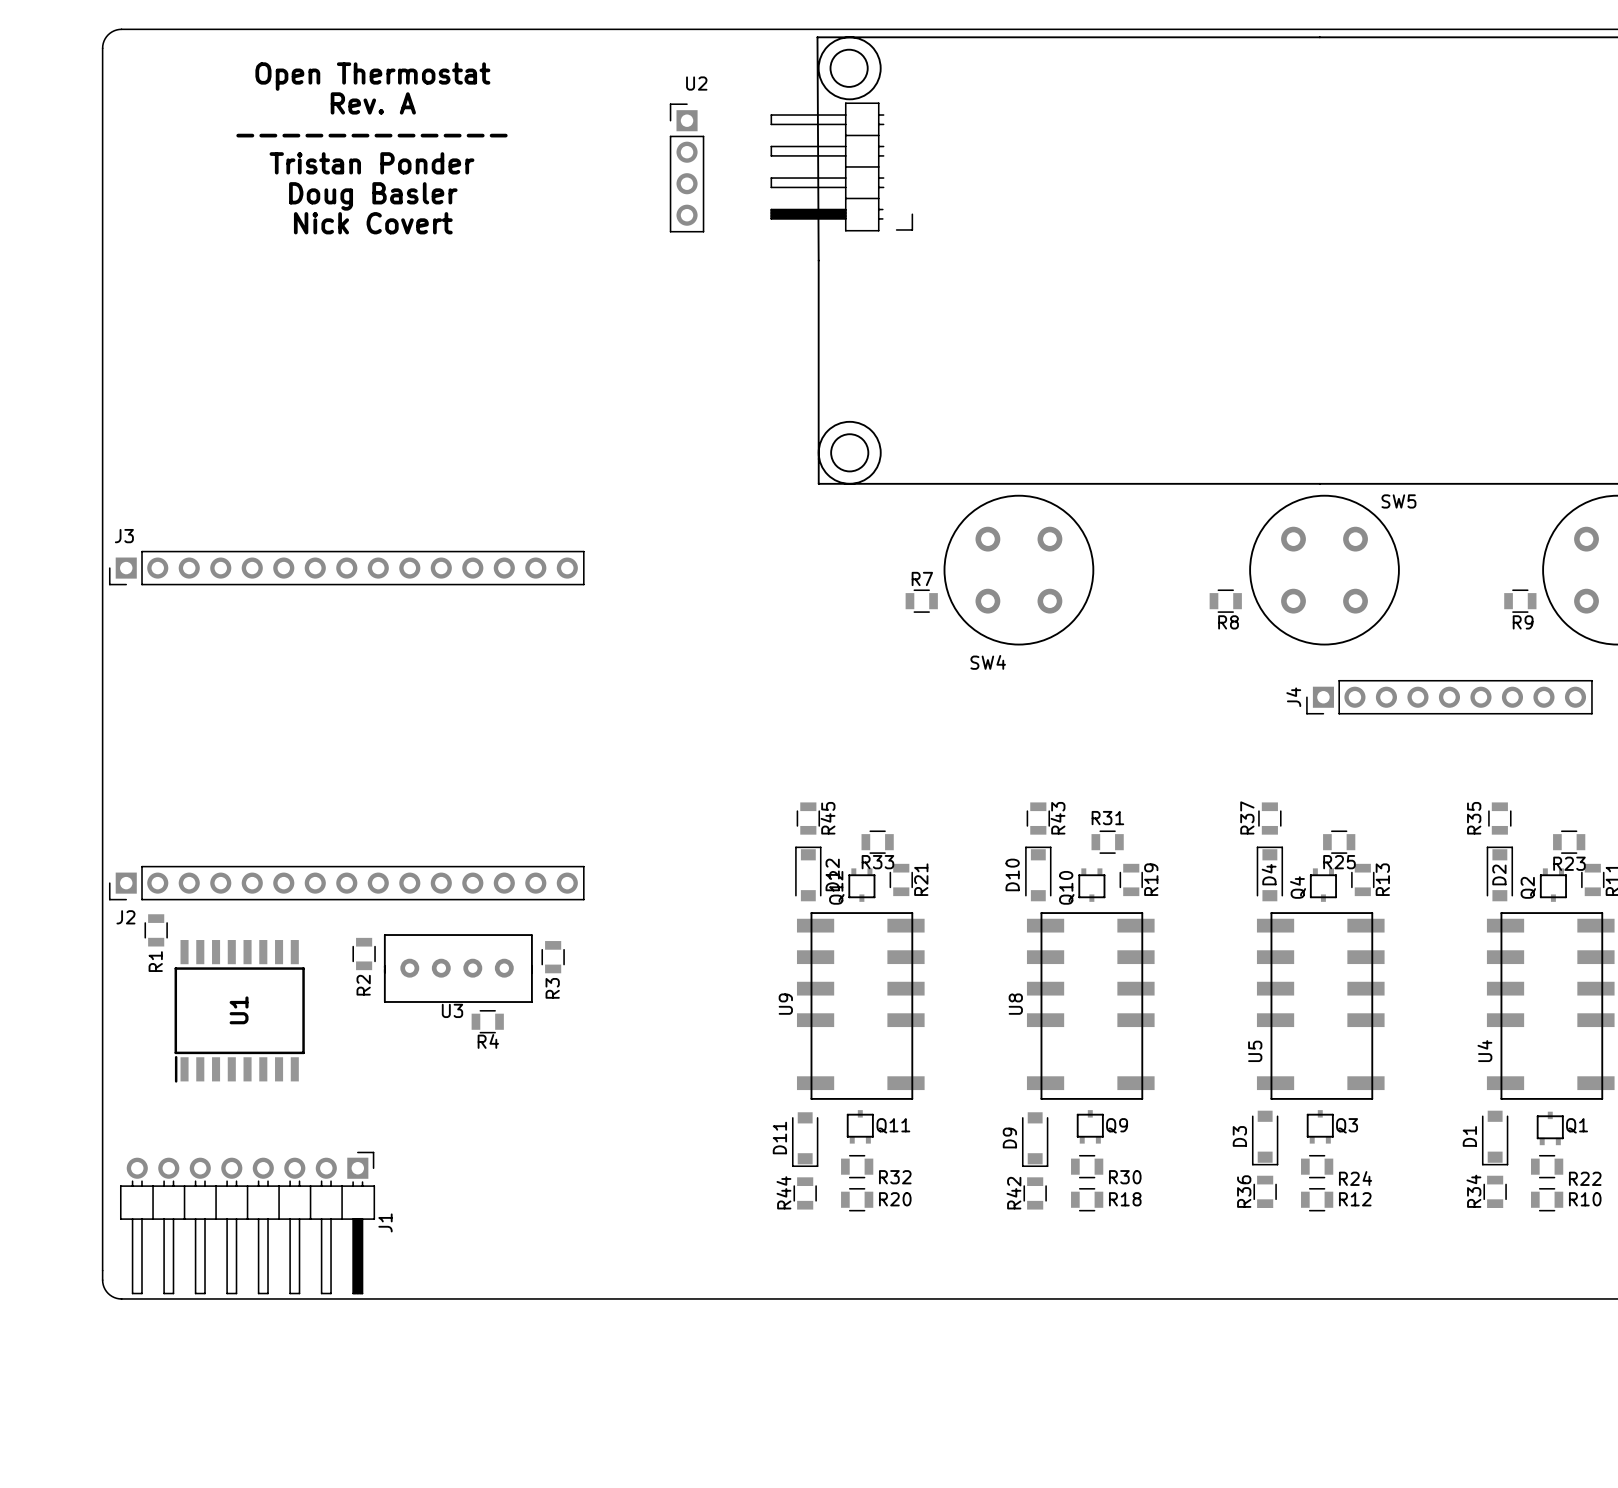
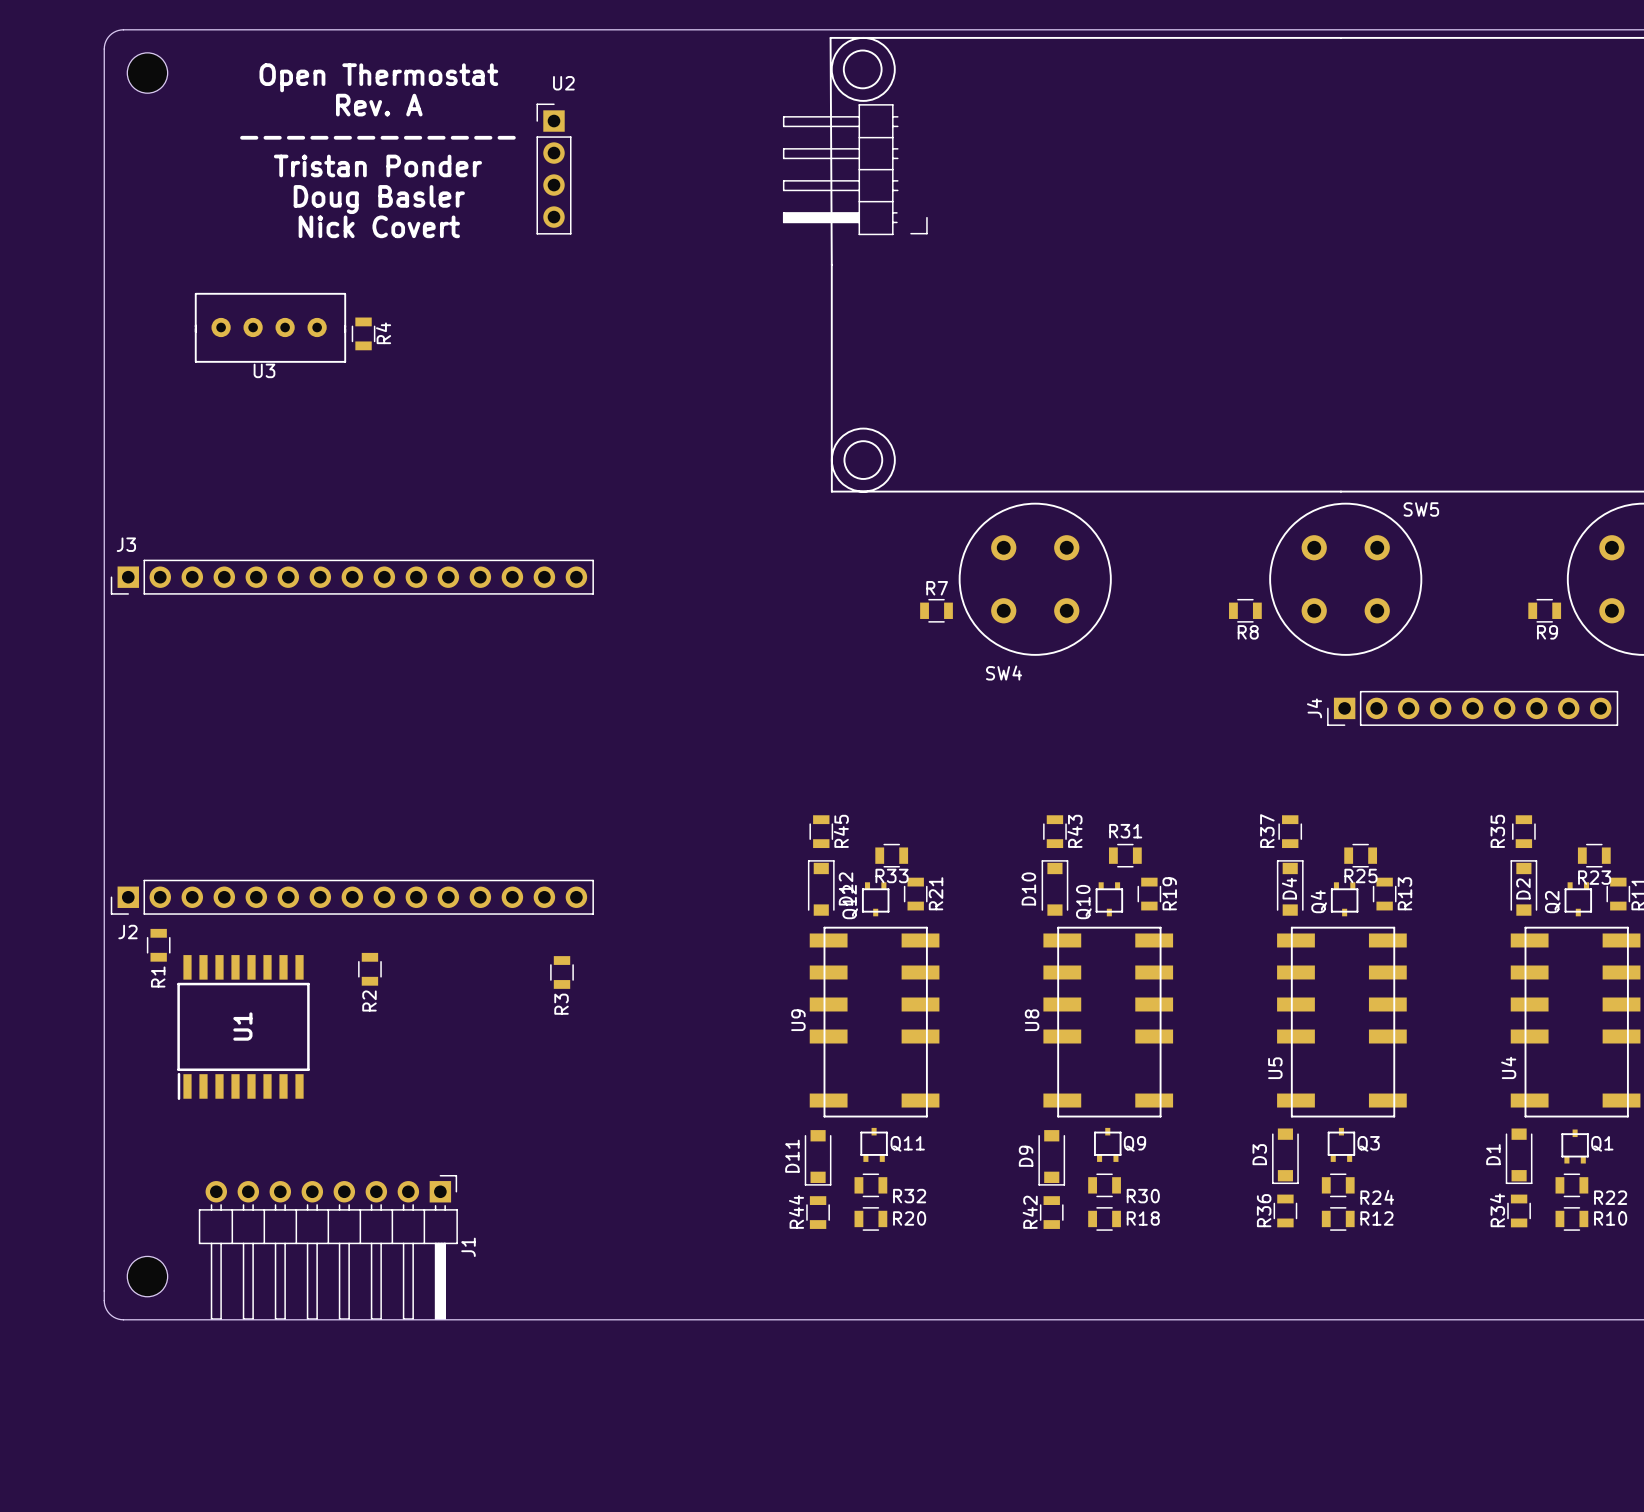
part: none -> (147, 73)
U2 position: (687, 167) -> (554, 169)
U3 position: (458, 968) -> (270, 327)
R4 rotation: 0° (487, 1021) -> 90° clockwise (363, 333)
R4 position: (487, 1021) -> (363, 333)
R4 name position: R4 (488, 1041) -> R4 (383, 333)
J1 position: (247, 1223) -> (328, 1247)
part: none -> (147, 1276)

